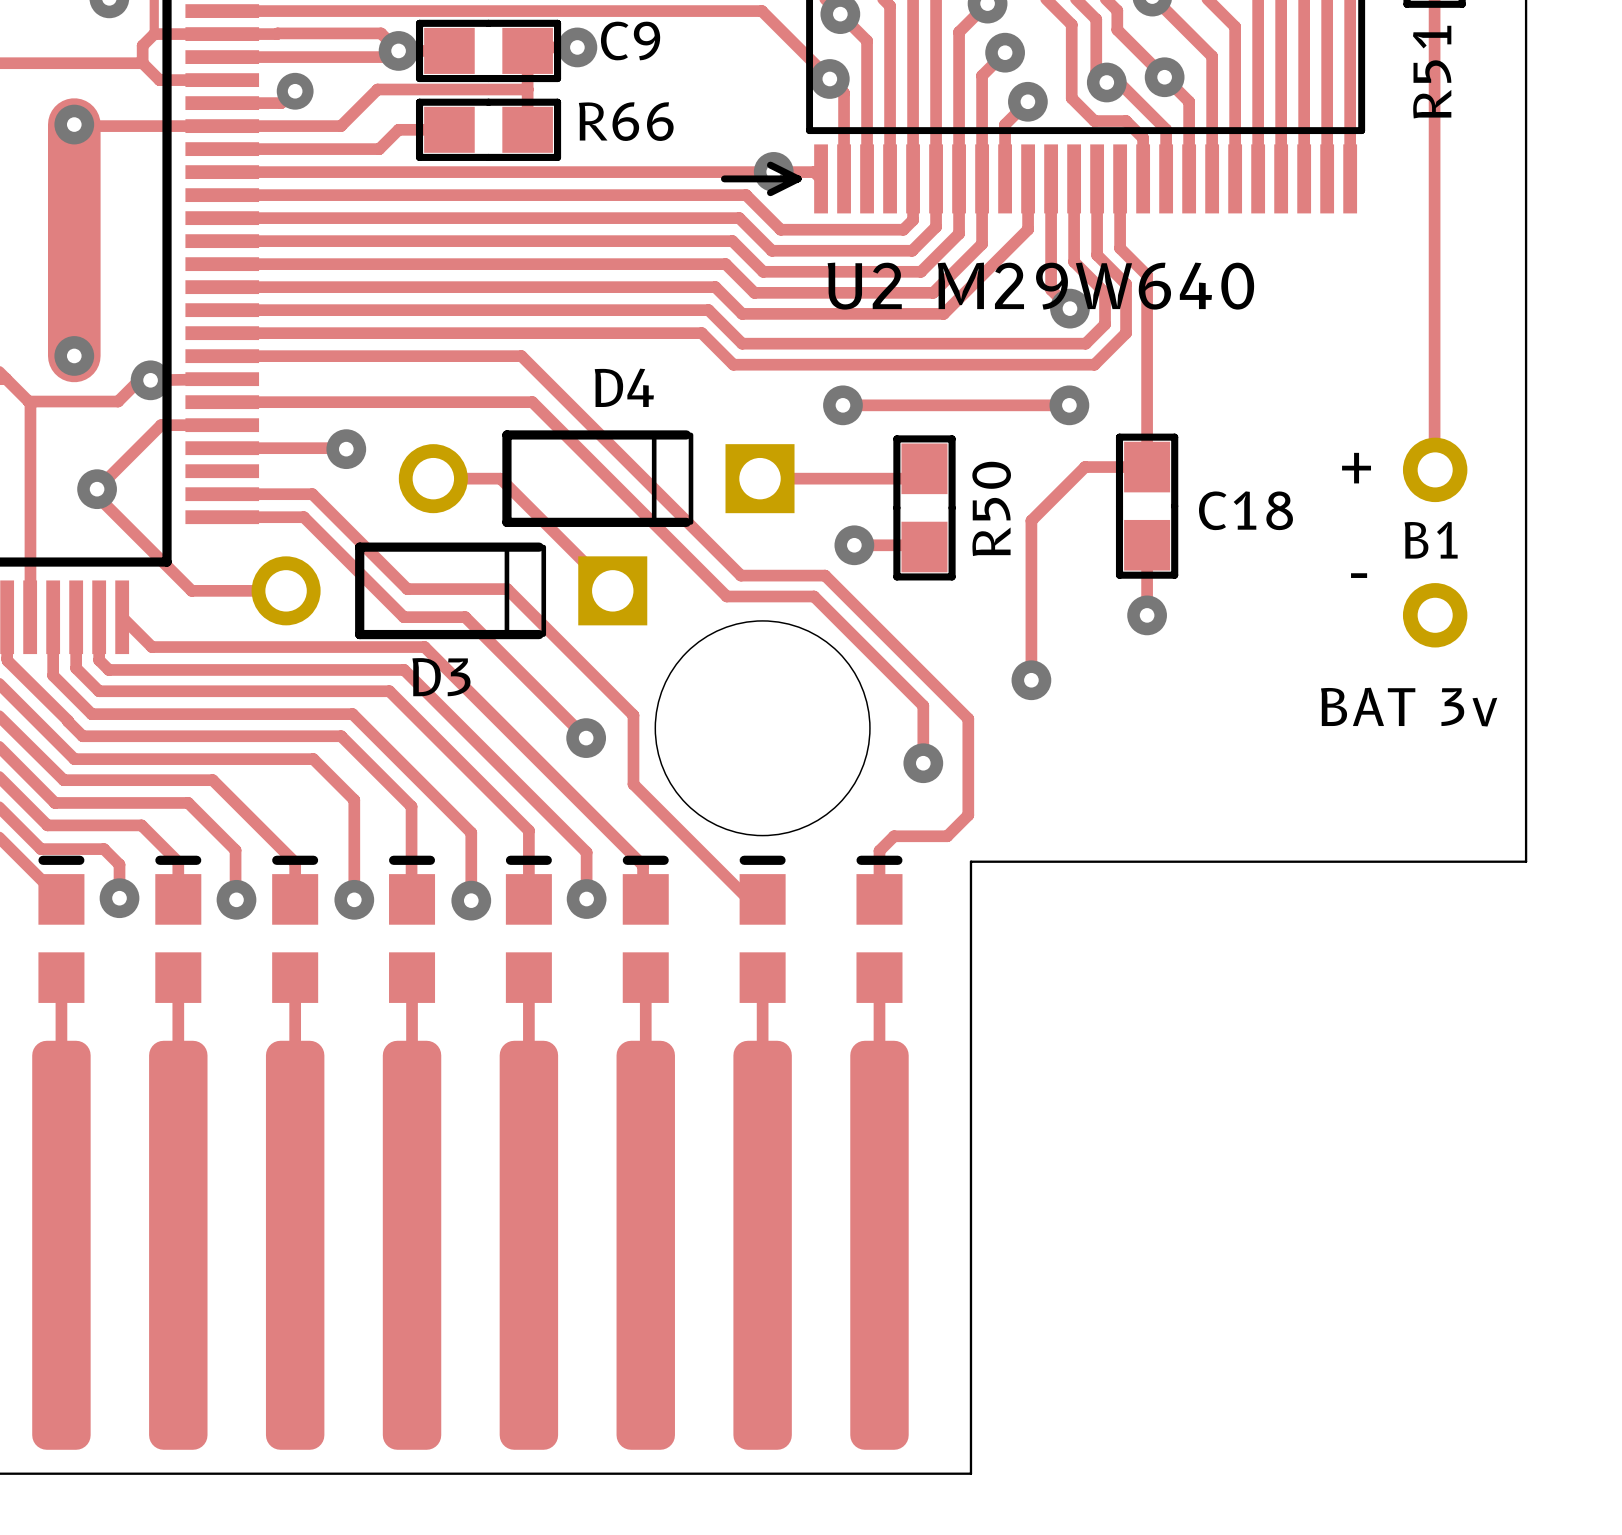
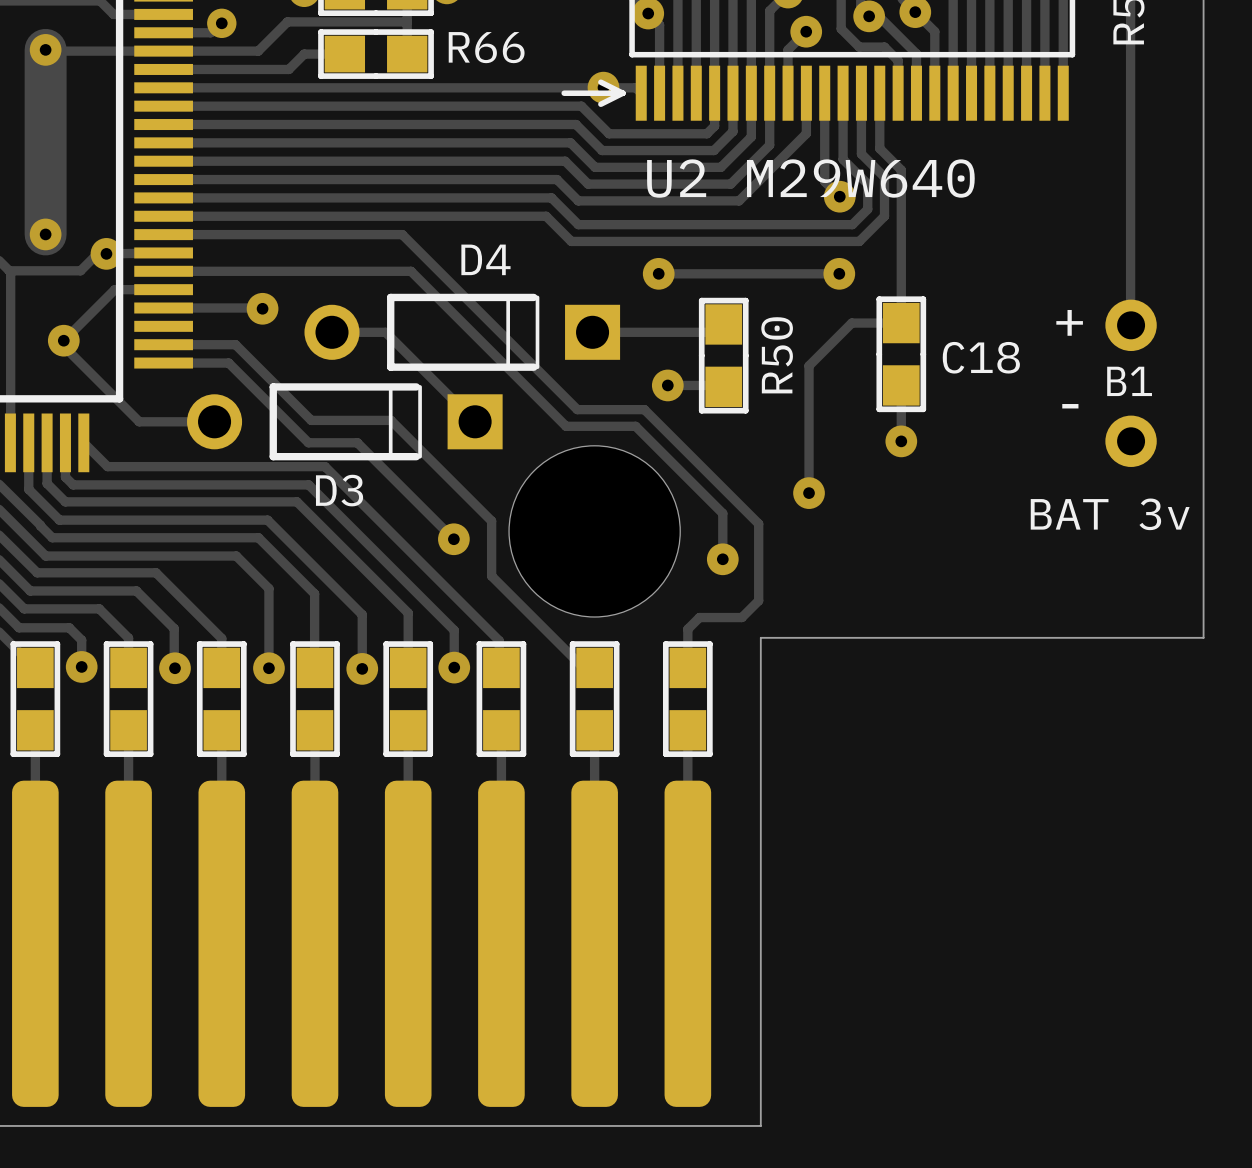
part footprint: [38, 855, 85, 1003] -> [10, 641, 61, 757]
part footprint: [155, 855, 202, 1003] -> [103, 641, 154, 757]
part footprint: [272, 855, 319, 1003] -> [196, 641, 247, 757]
part footprint: [389, 855, 436, 1003] -> [290, 641, 340, 757]
part footprint: [505, 855, 552, 1003] -> [383, 641, 434, 757]
part footprint: [622, 855, 669, 1003] -> [476, 641, 527, 757]
part footprint: [739, 855, 786, 1003] -> [569, 641, 620, 757]
part footprint: [856, 855, 903, 1003] -> [663, 641, 713, 757]

